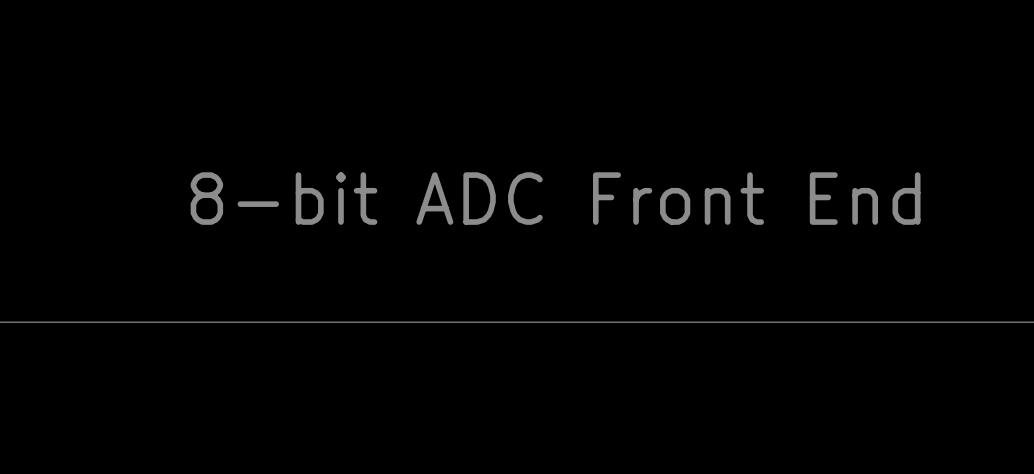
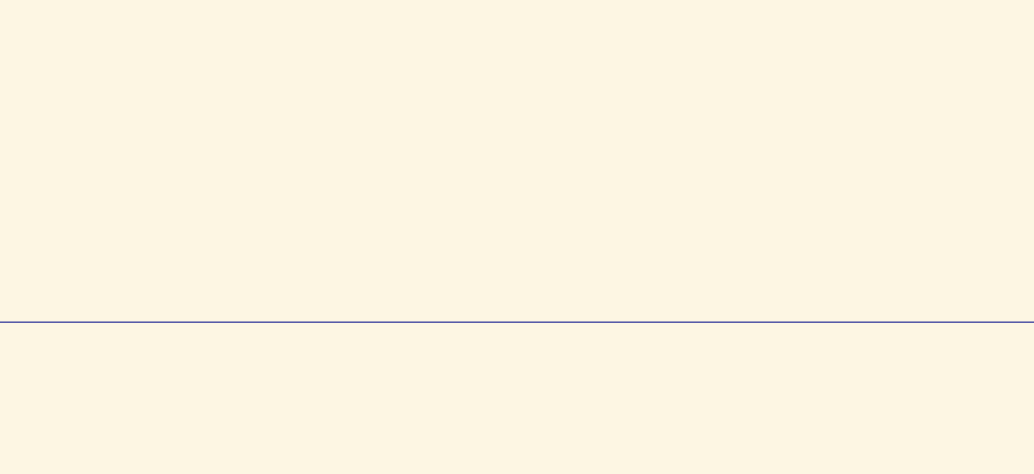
text: 8-bit ADC Front End (555, 198) -> none

